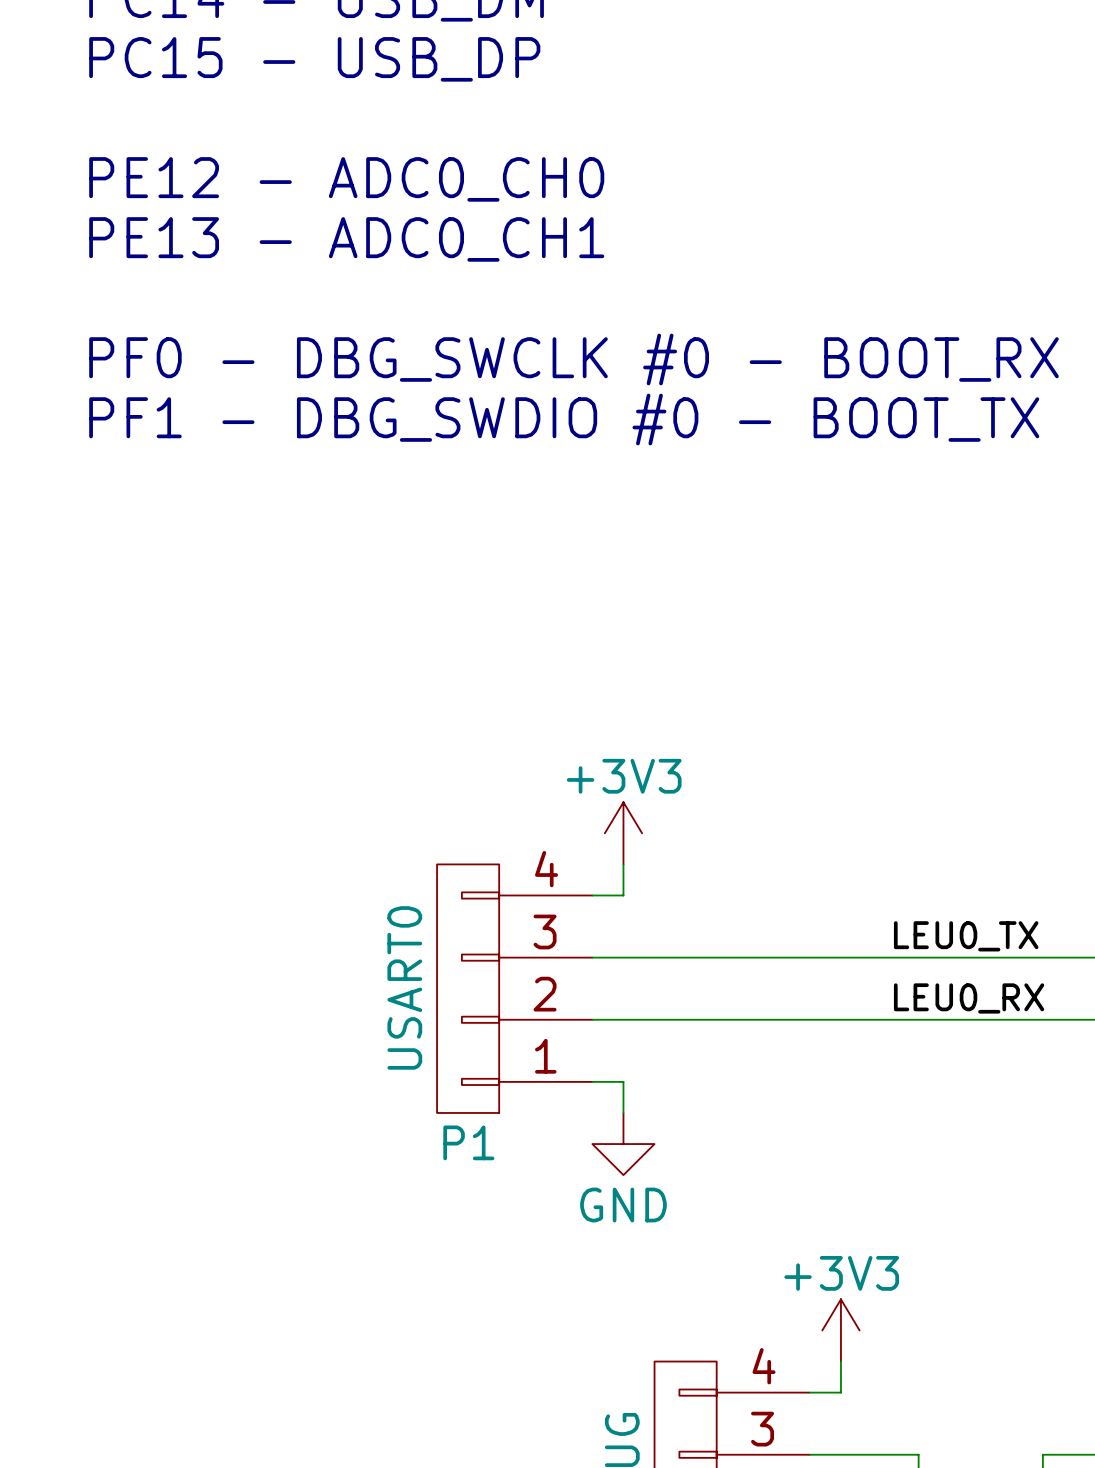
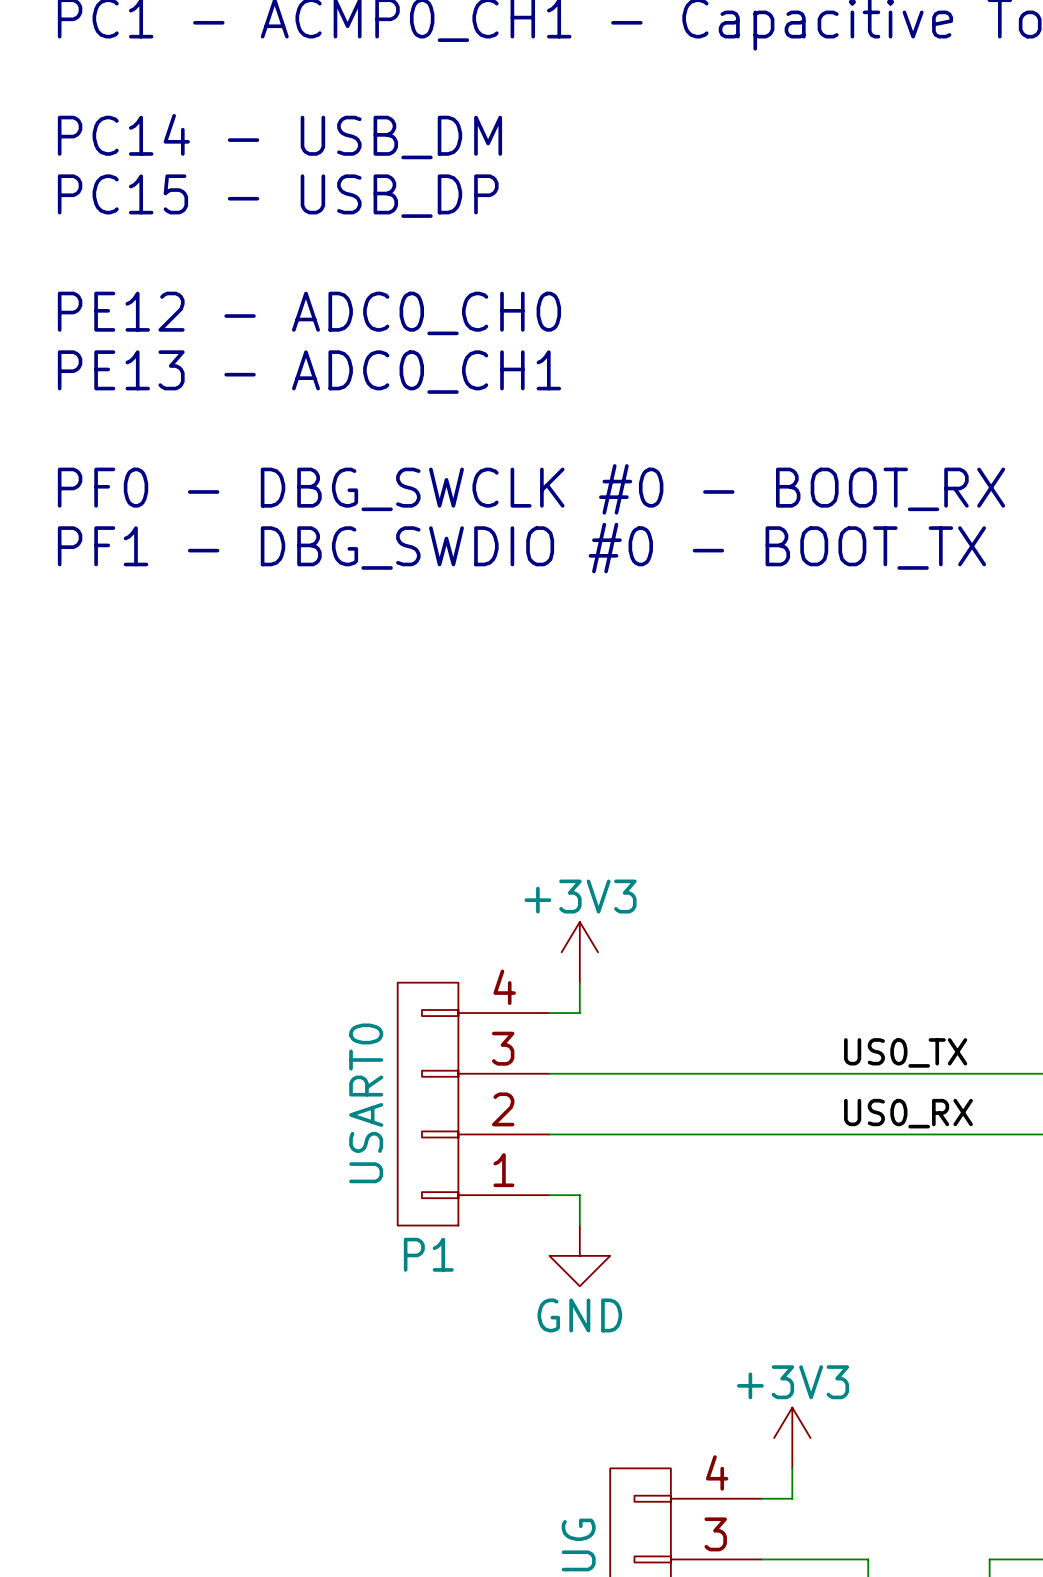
label: LEU0_TX (966, 936) -> US0_TX (905, 1052)
label: LEU0_RX (969, 998) -> US0_RX (908, 1113)

